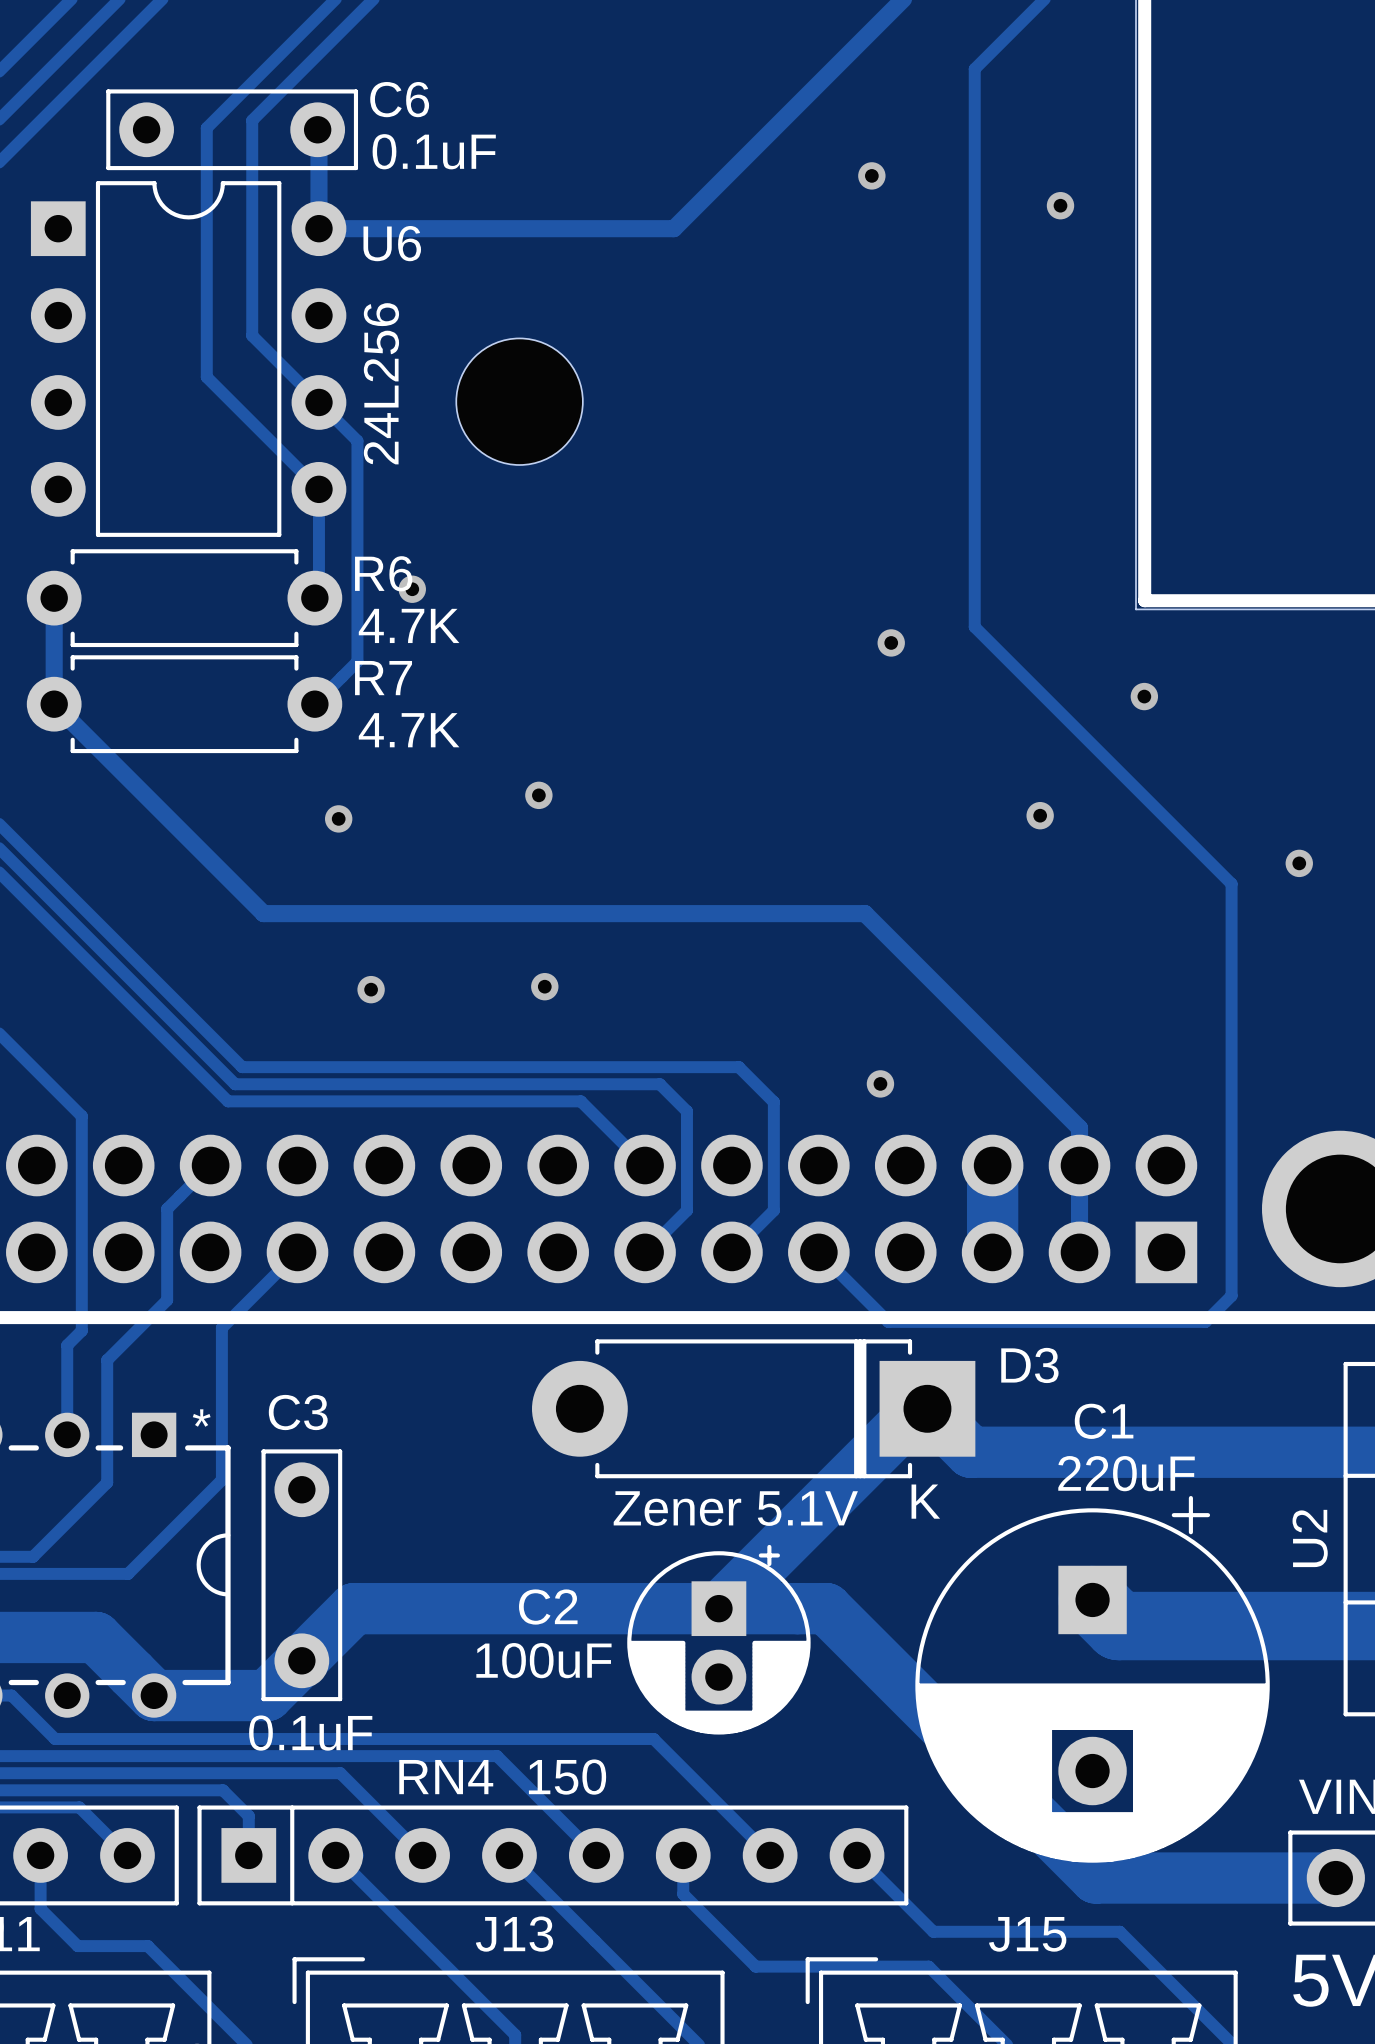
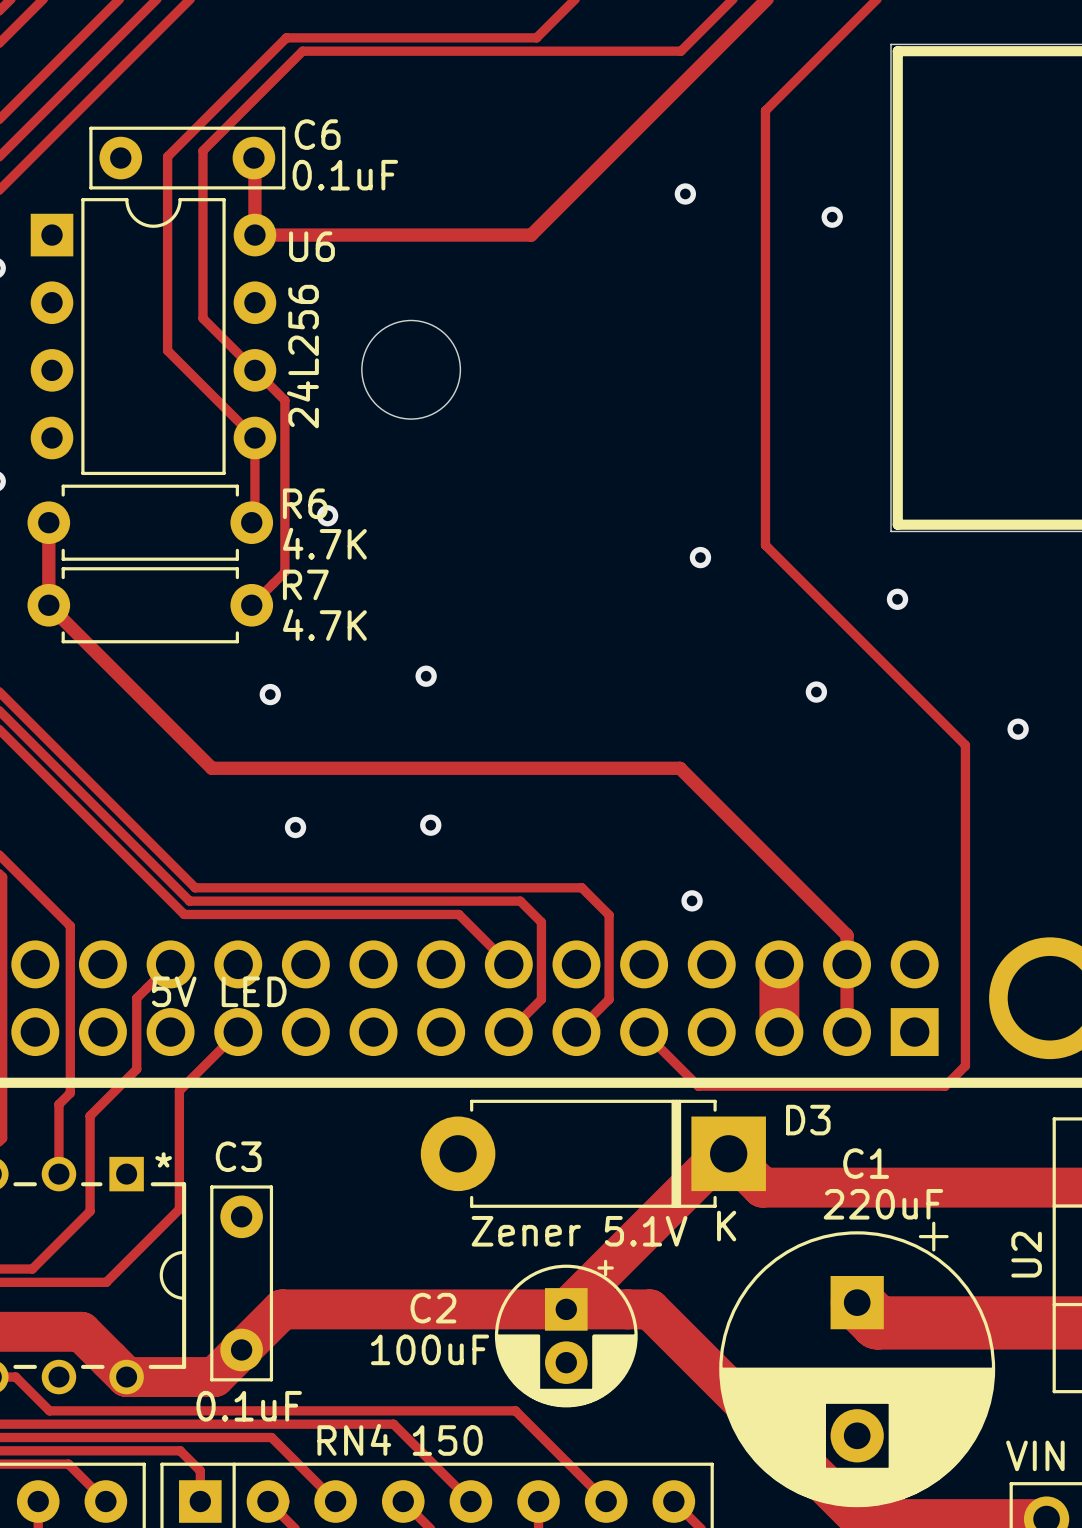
drawing: none -> [151, 976, 287, 1008]

